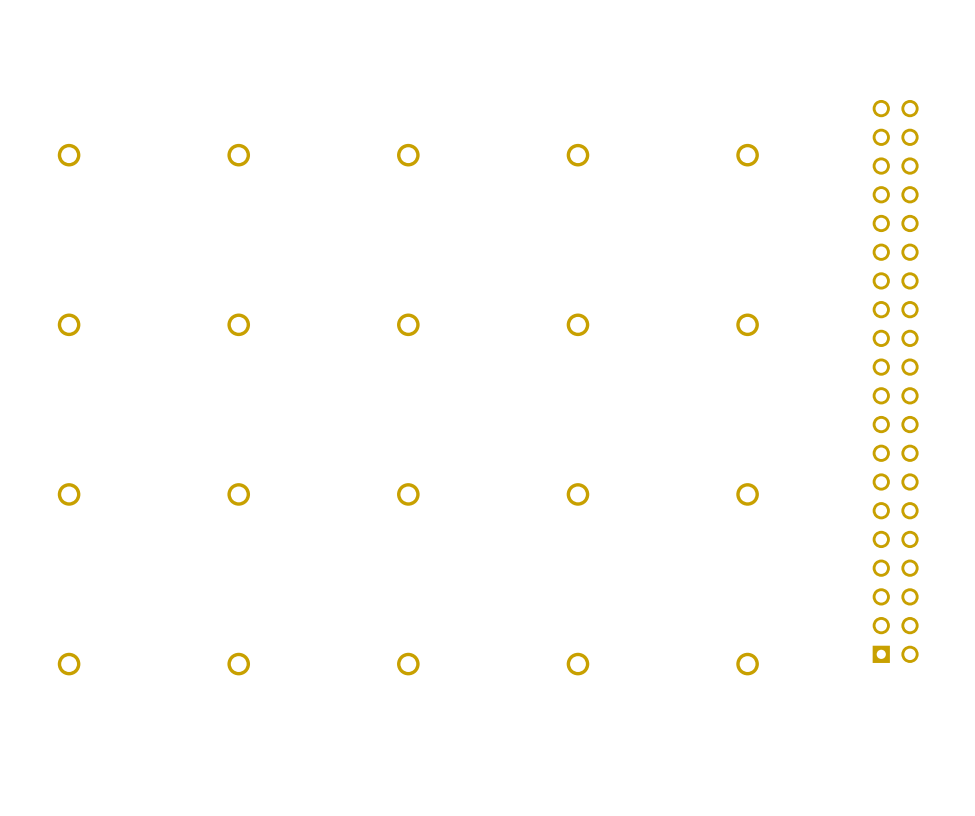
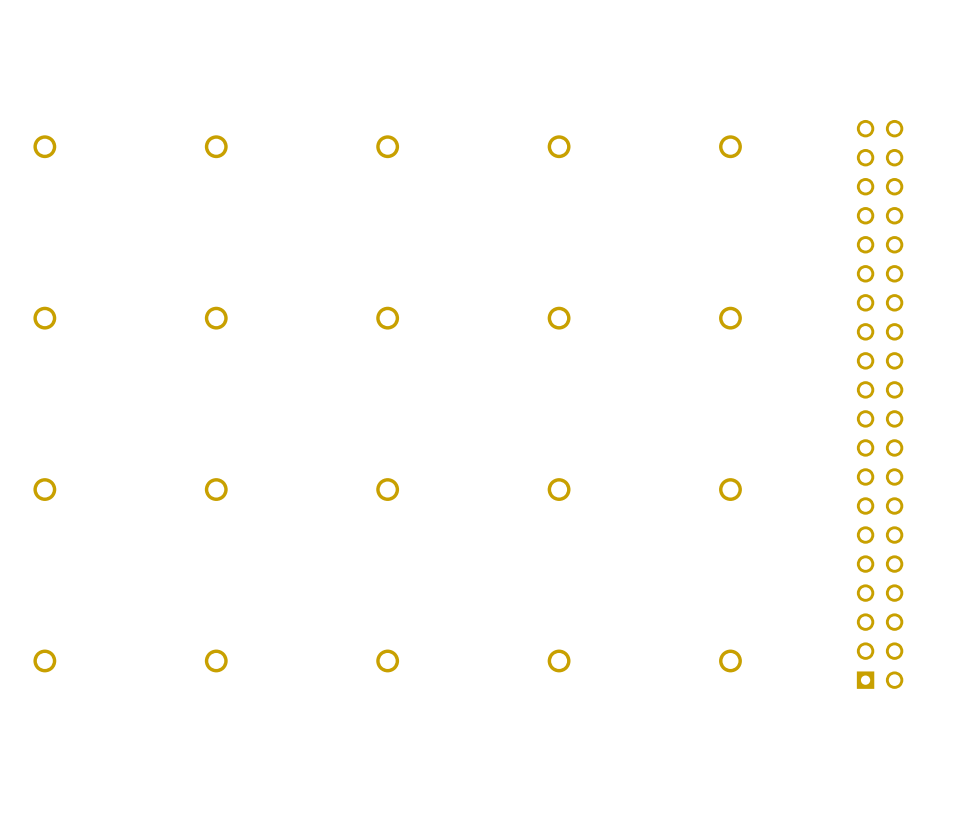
part position: (895, 381) -> (880, 404)

